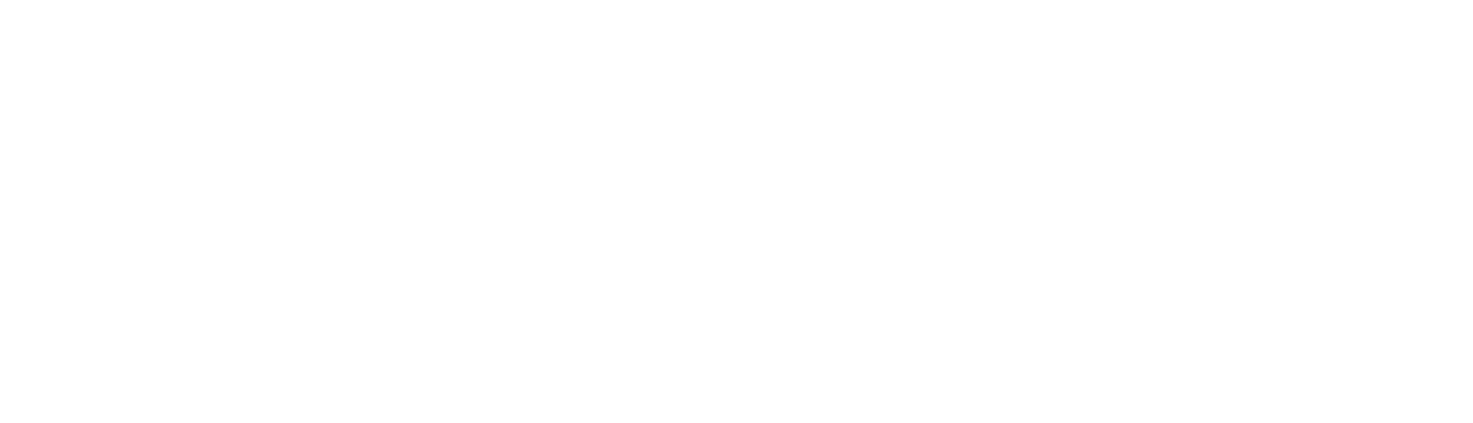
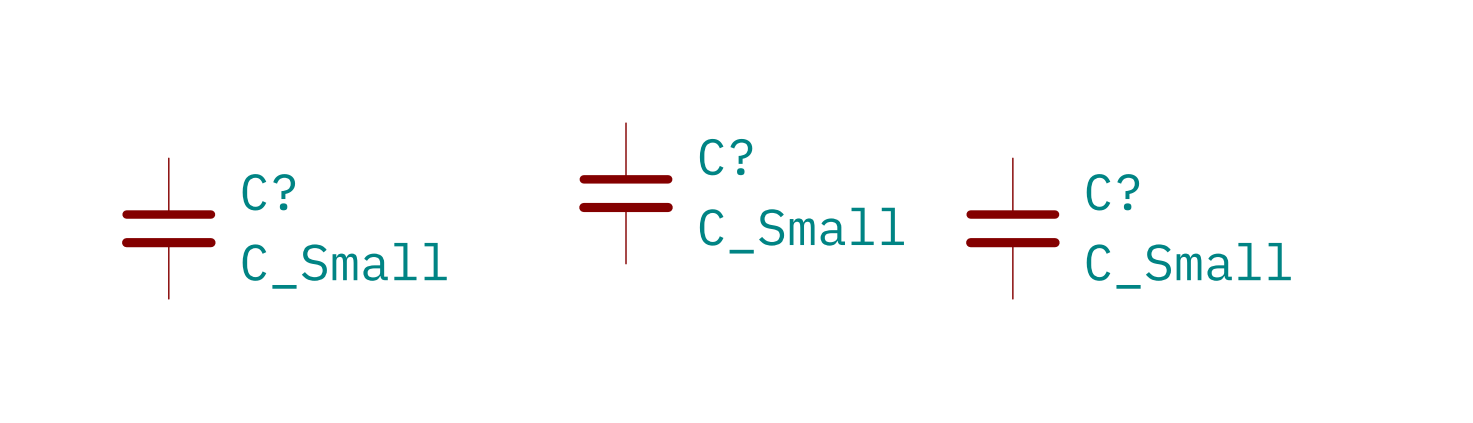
C?: none -> C_Small (626, 193)
C?: none -> C_Small (168, 228)
C?: none -> C_Small (1012, 228)

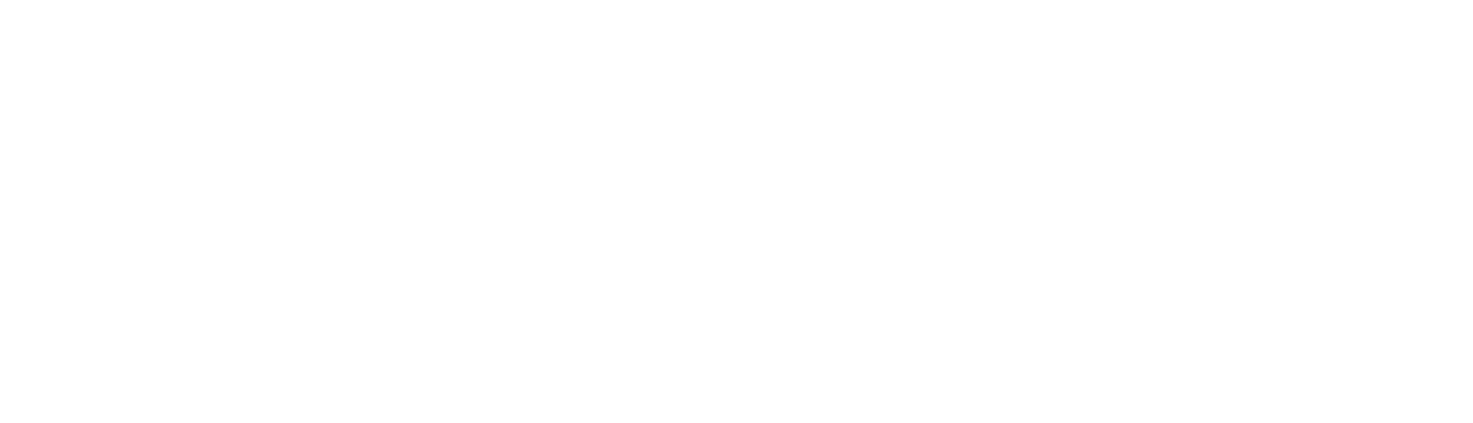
C?: C_Small (626, 193) -> none
C?: C_Small (168, 228) -> none
C?: C_Small (1012, 228) -> none

